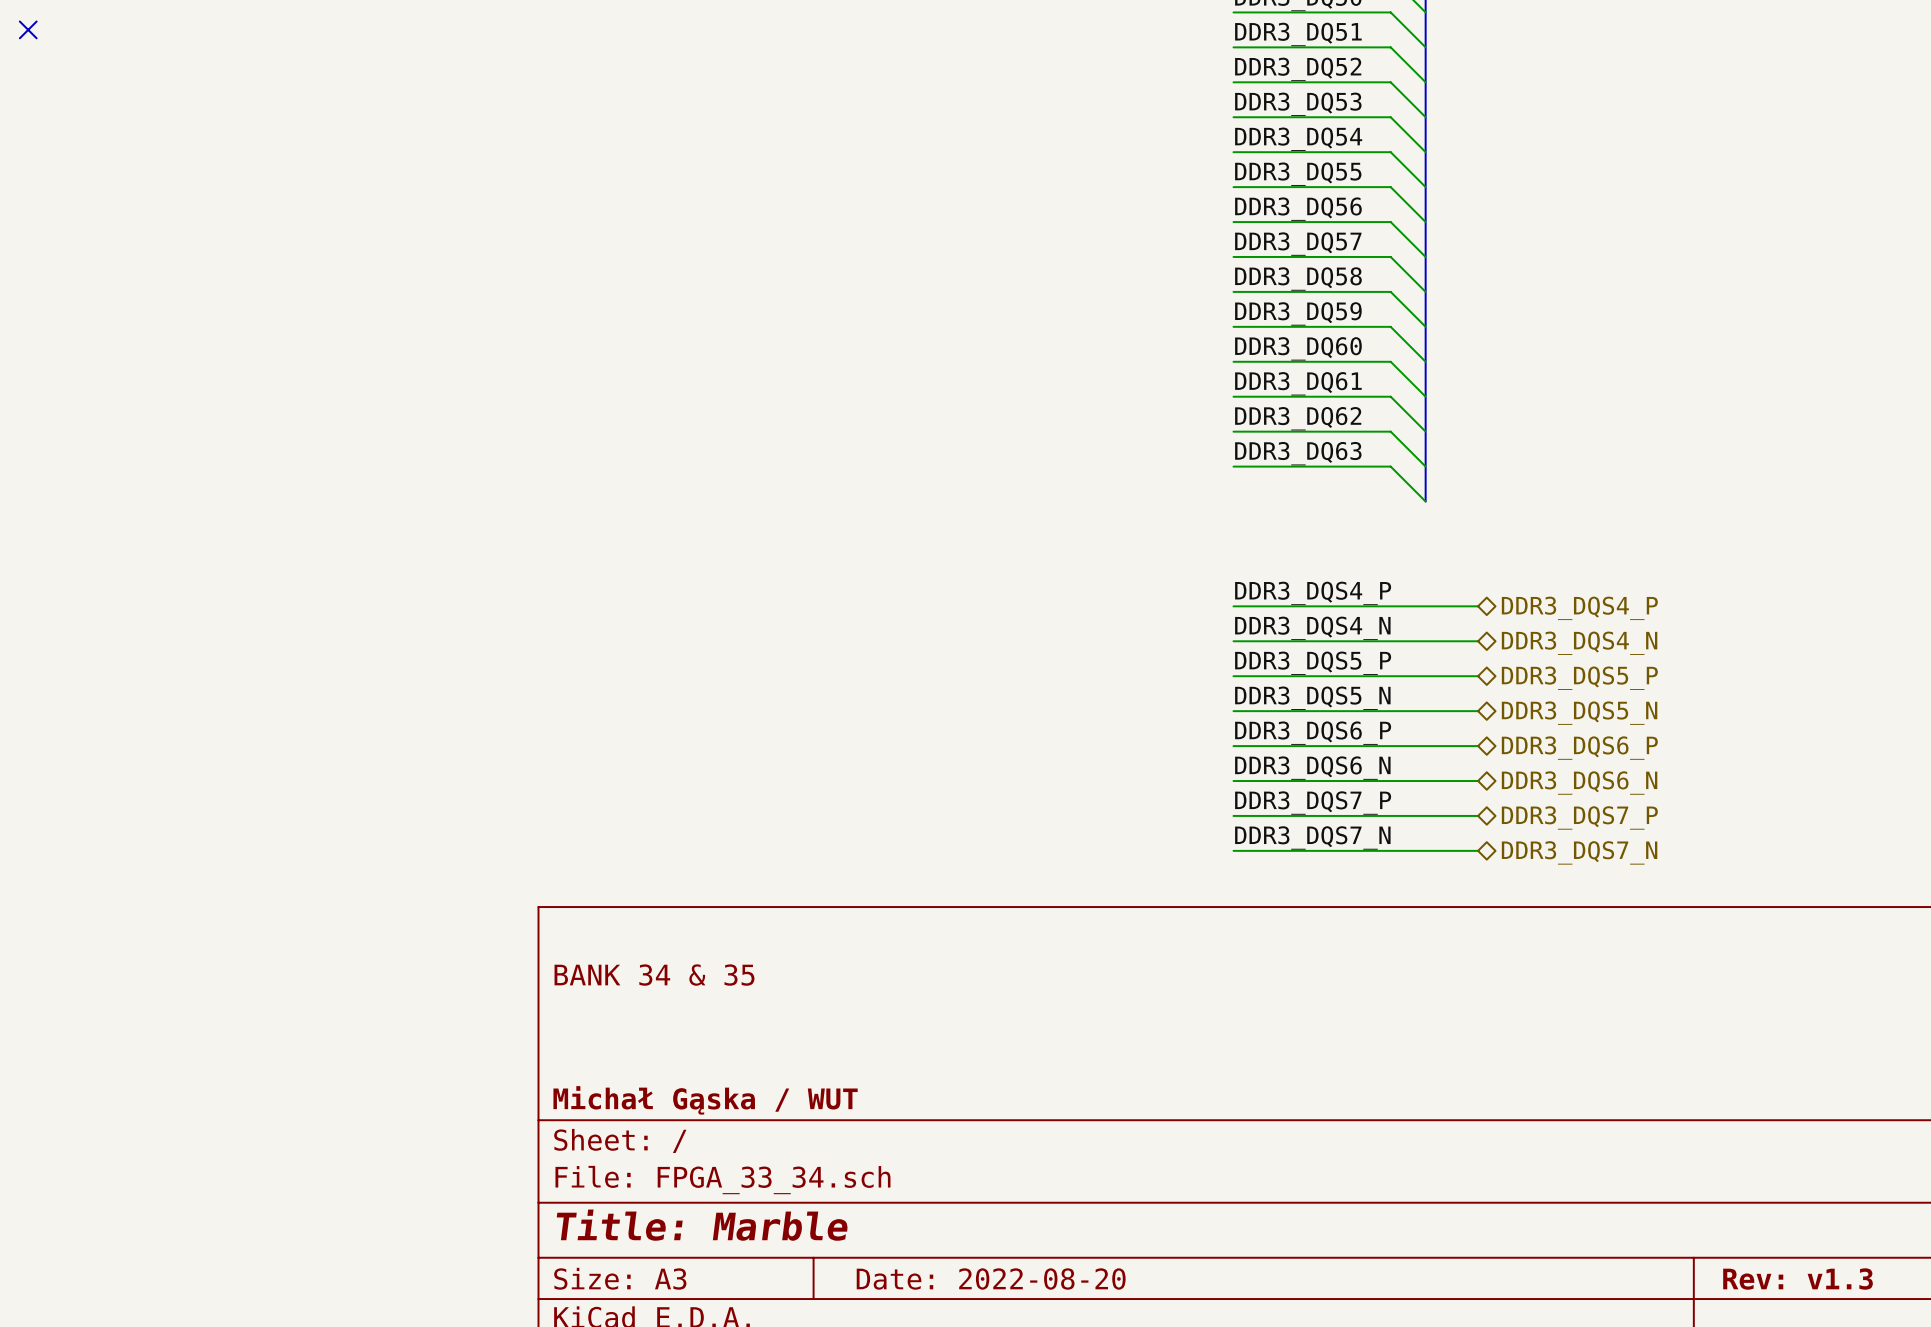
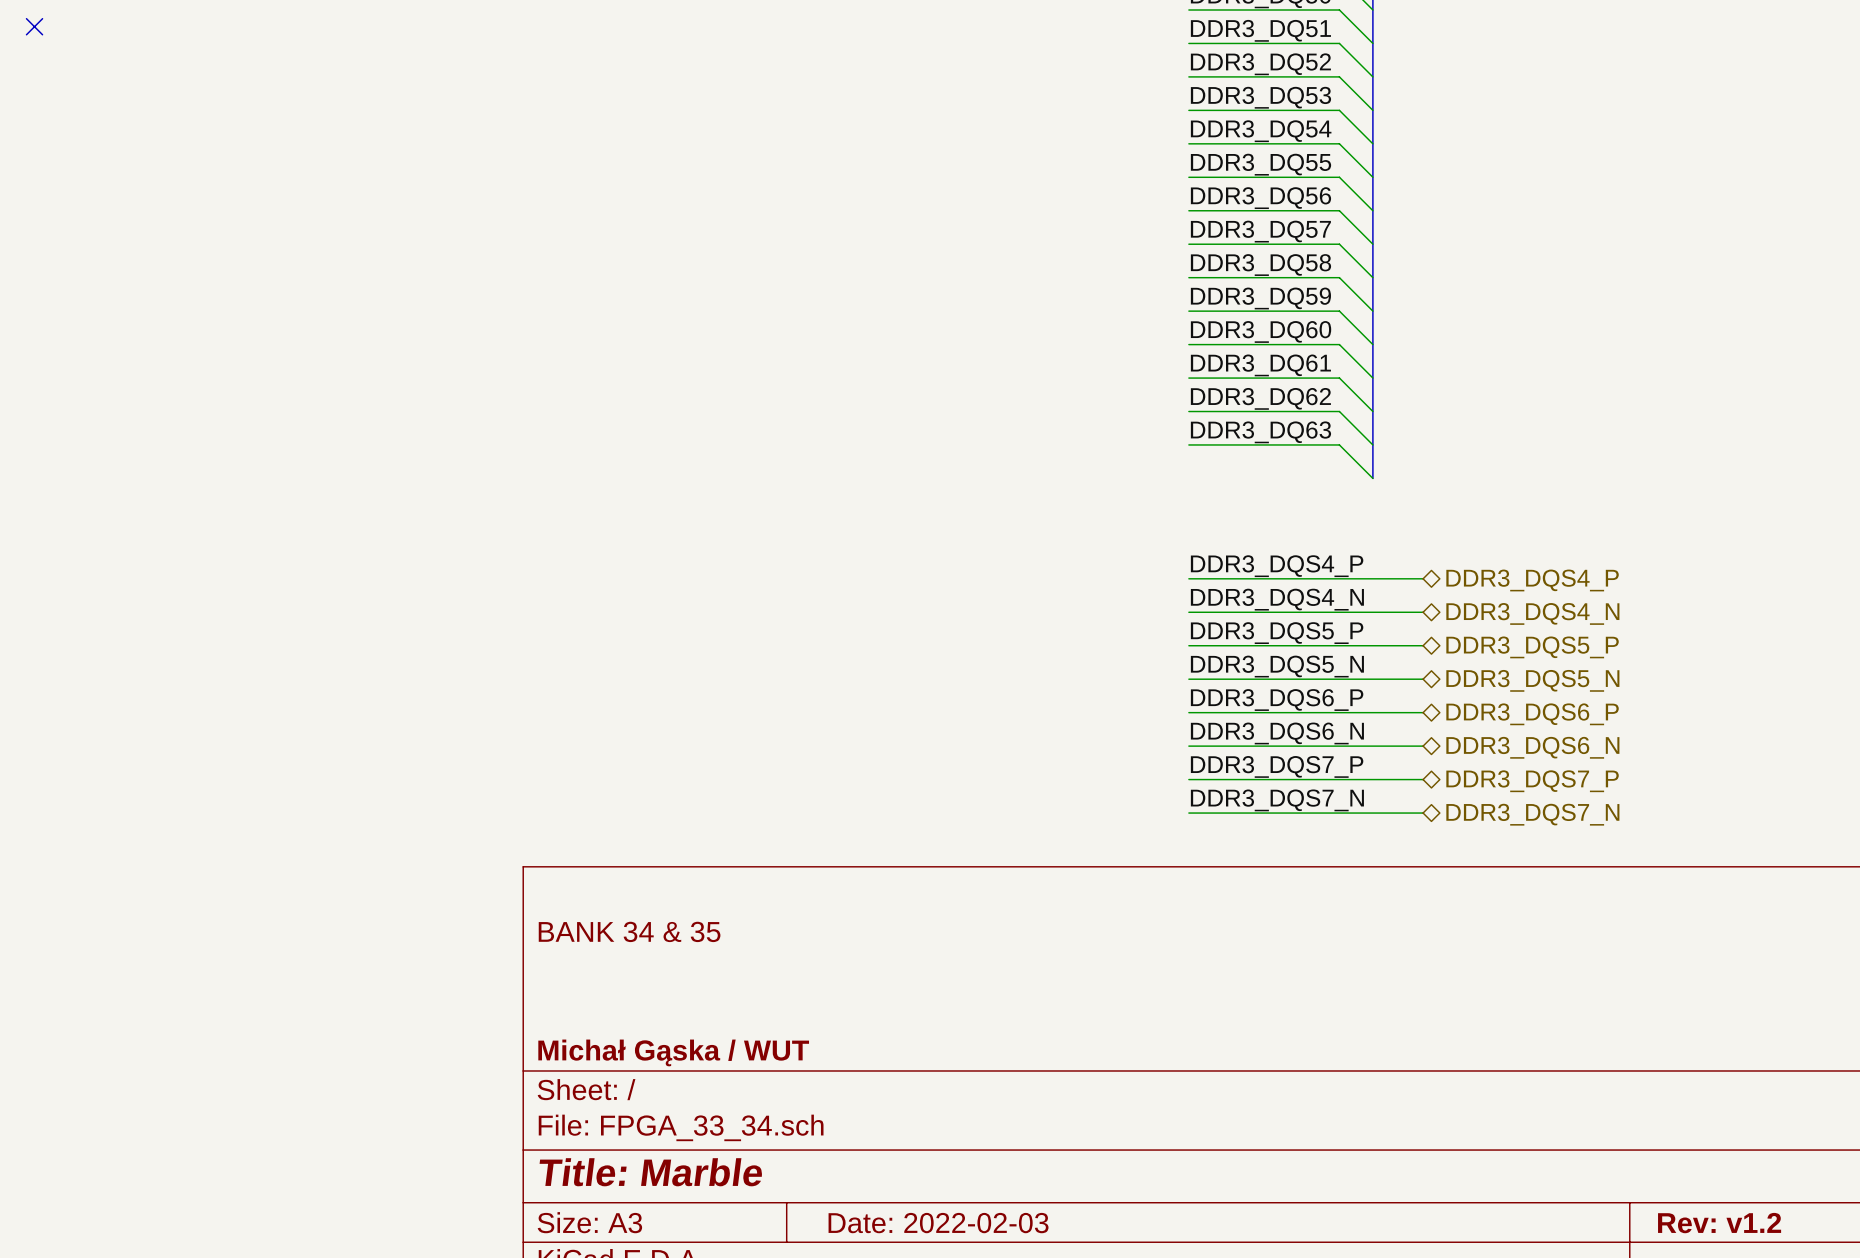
title block: Date: 2022-08-20 (991, 1279) -> Date: 2022-02-03 (938, 1223)
title block: Rev: v1.3 (1798, 1279) -> Rev: v1.2 (1719, 1223)

